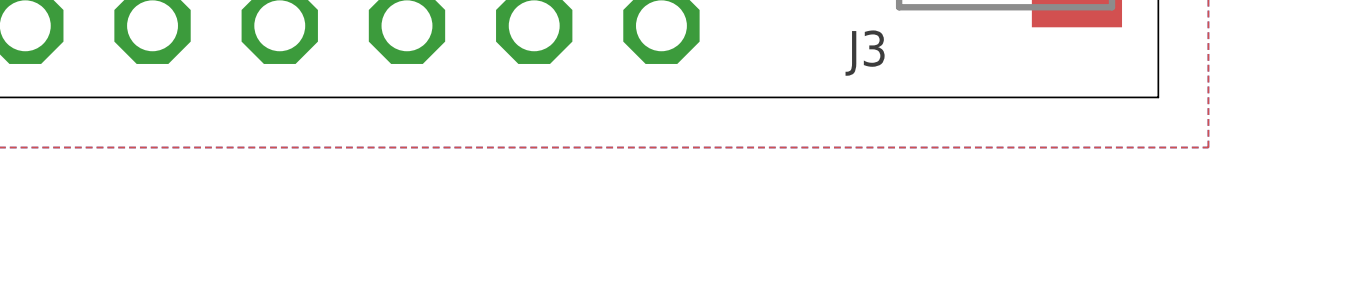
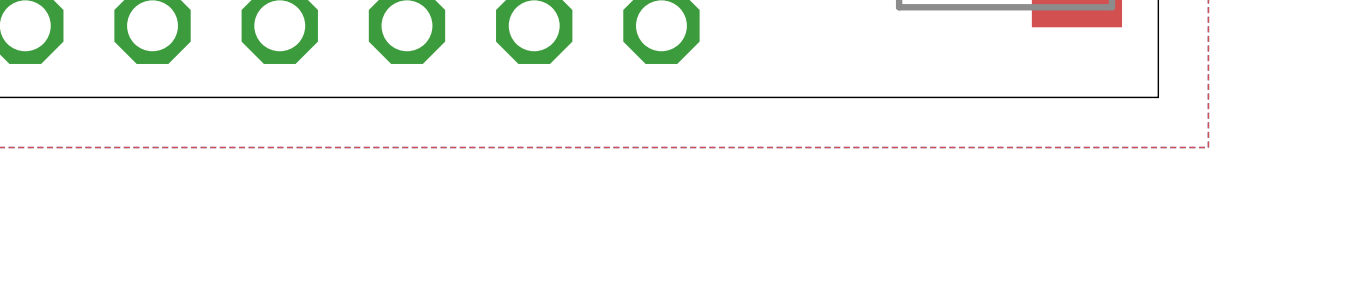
J3 name: J3 (865, 53) -> none

